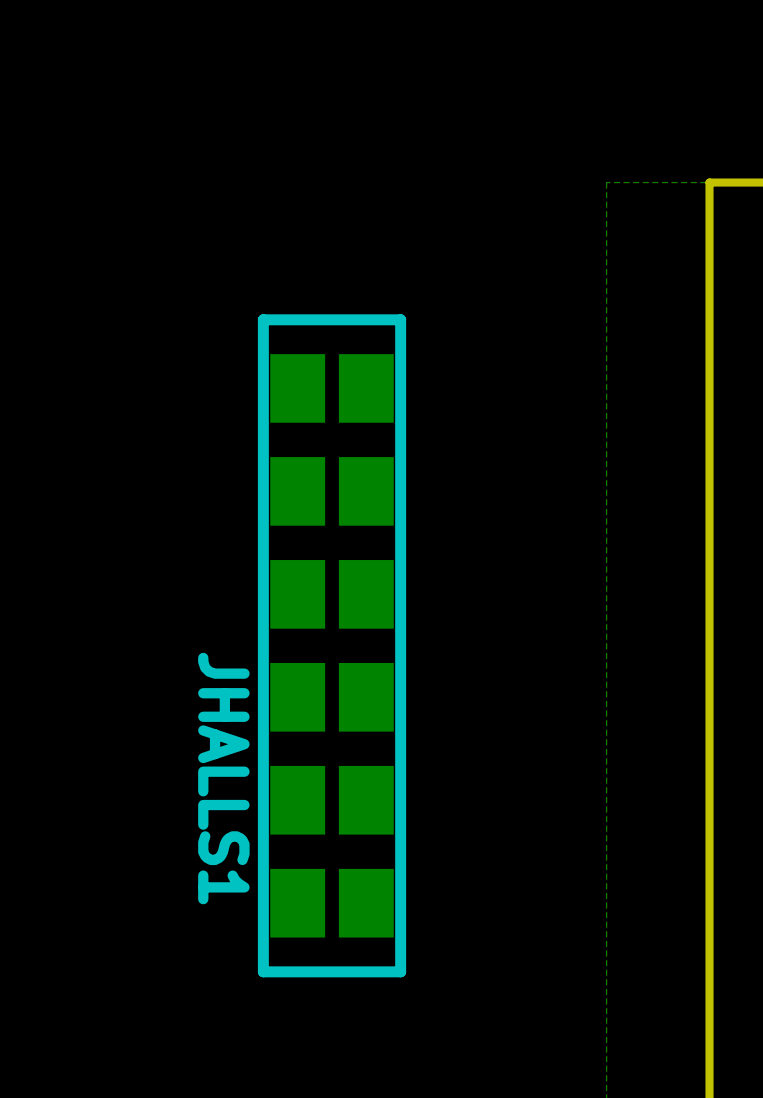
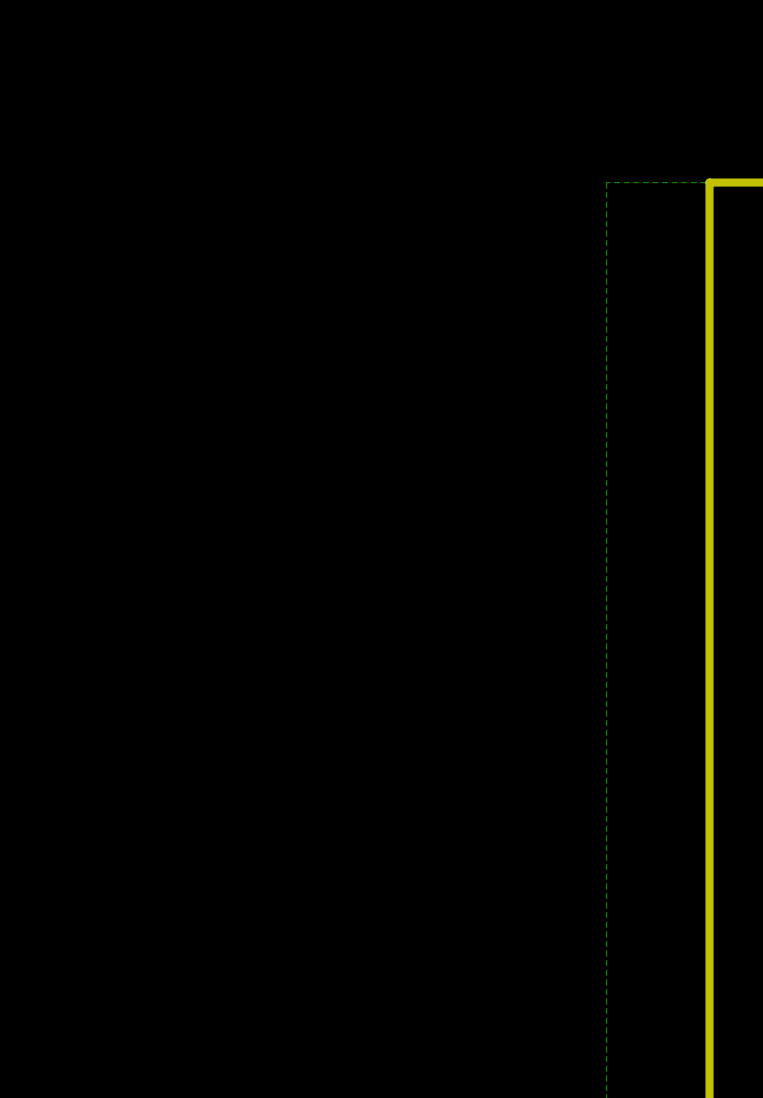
JHALLS1: (332, 645) -> none

